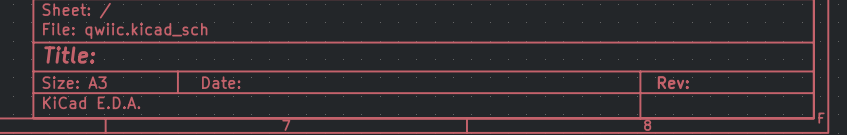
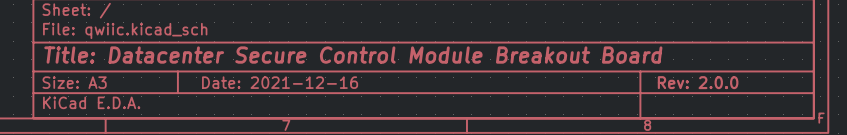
title block: Title: (69, 55) -> Title: Datacenter Secure Control Module Breakout Board (353, 55)
title block: Date: (221, 82) -> Date: 2021-12-16 (280, 82)
title block: Rev: (673, 82) -> Rev: 2.0.0 (698, 82)

